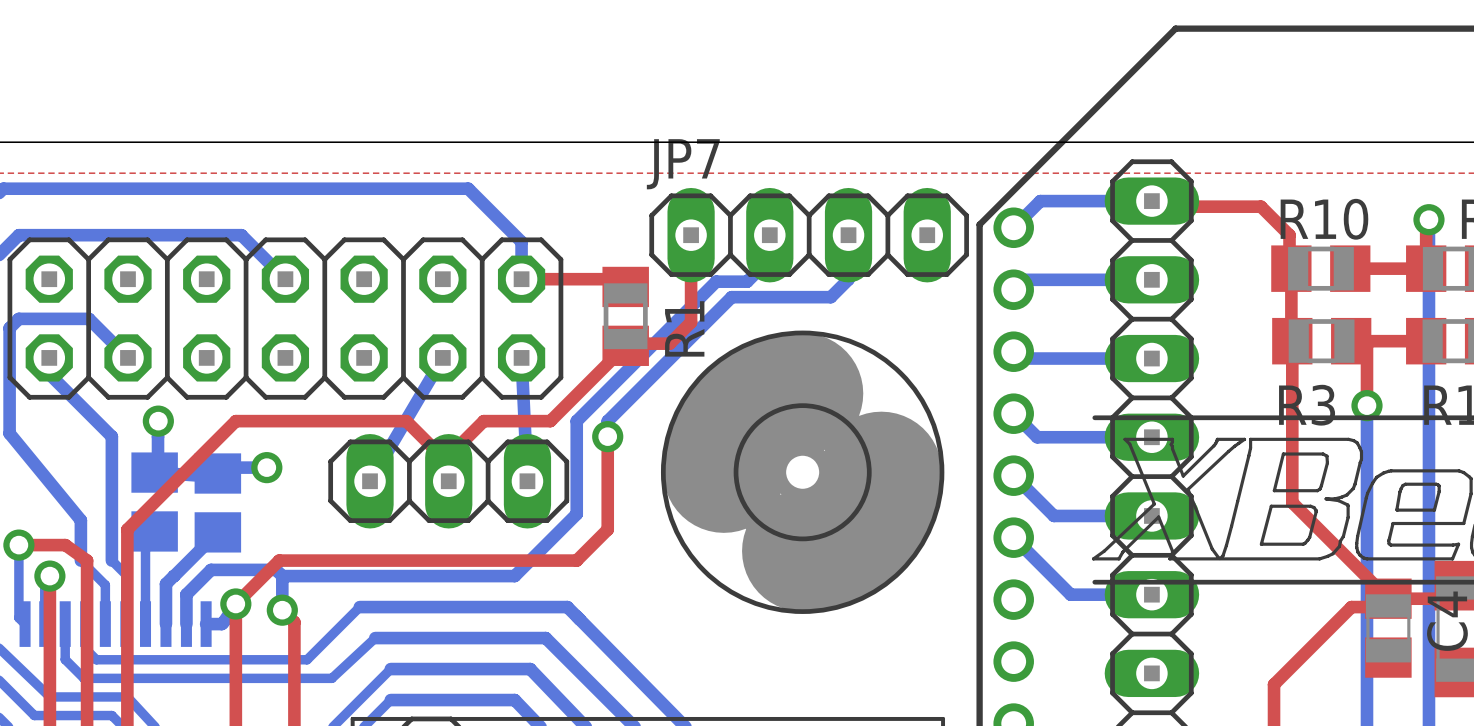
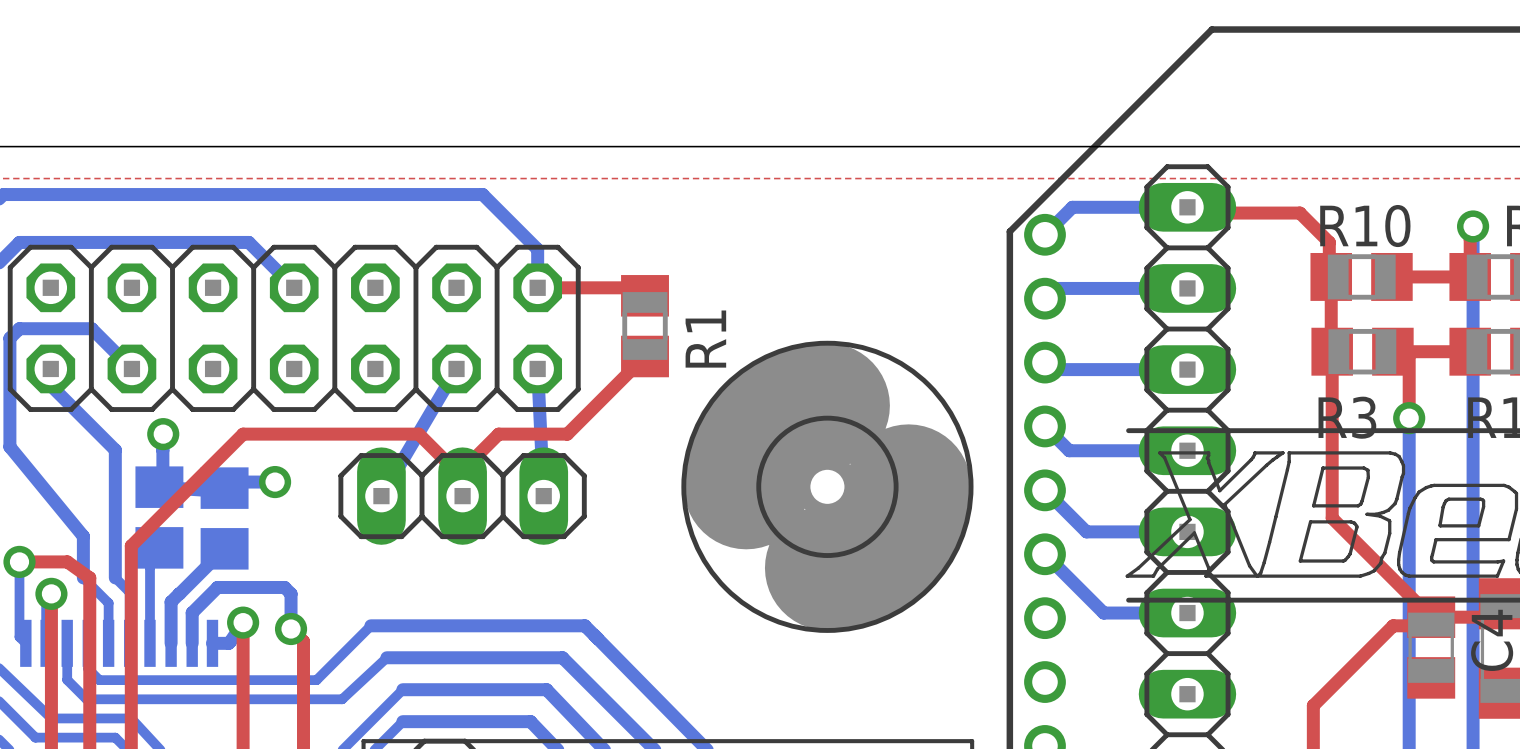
top track: (691, 235) (691, 322) (669, 343) (627, 343) (625, 345) -> none
bottom track: (769, 235) (769, 259) (747, 281) (716, 281) (576, 421) (576, 514) (514, 576) (282, 576) -> none
JP7: (809, 235) -> none
bottom track: (848, 235) (848, 279) (830, 297) (731, 297) (607, 421) (607, 436) -> none
top track: (607, 436) (607, 529) (576, 560) (279, 560) (235, 603) -> none
via: (607, 436) -> none

